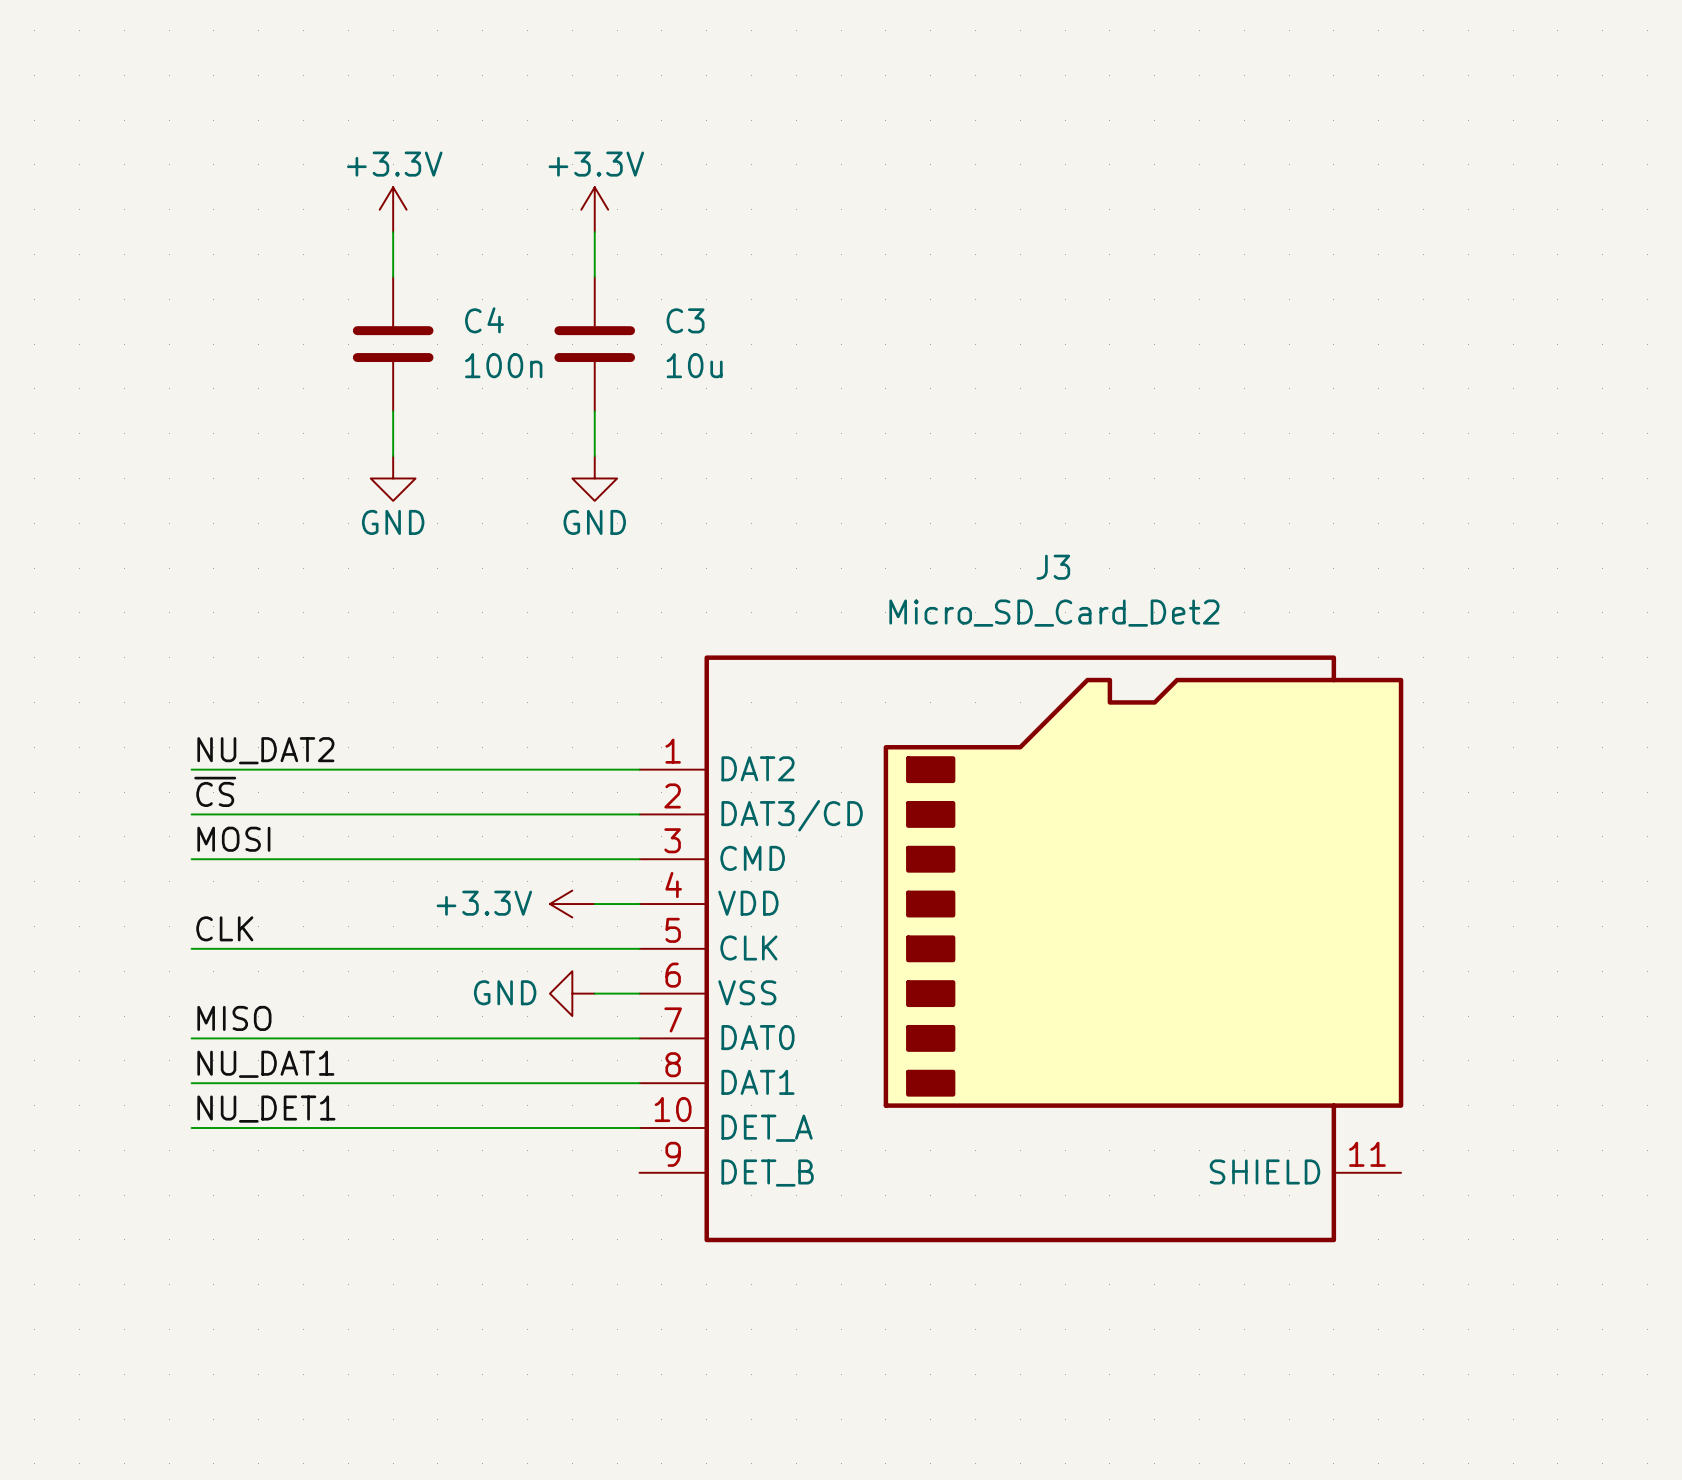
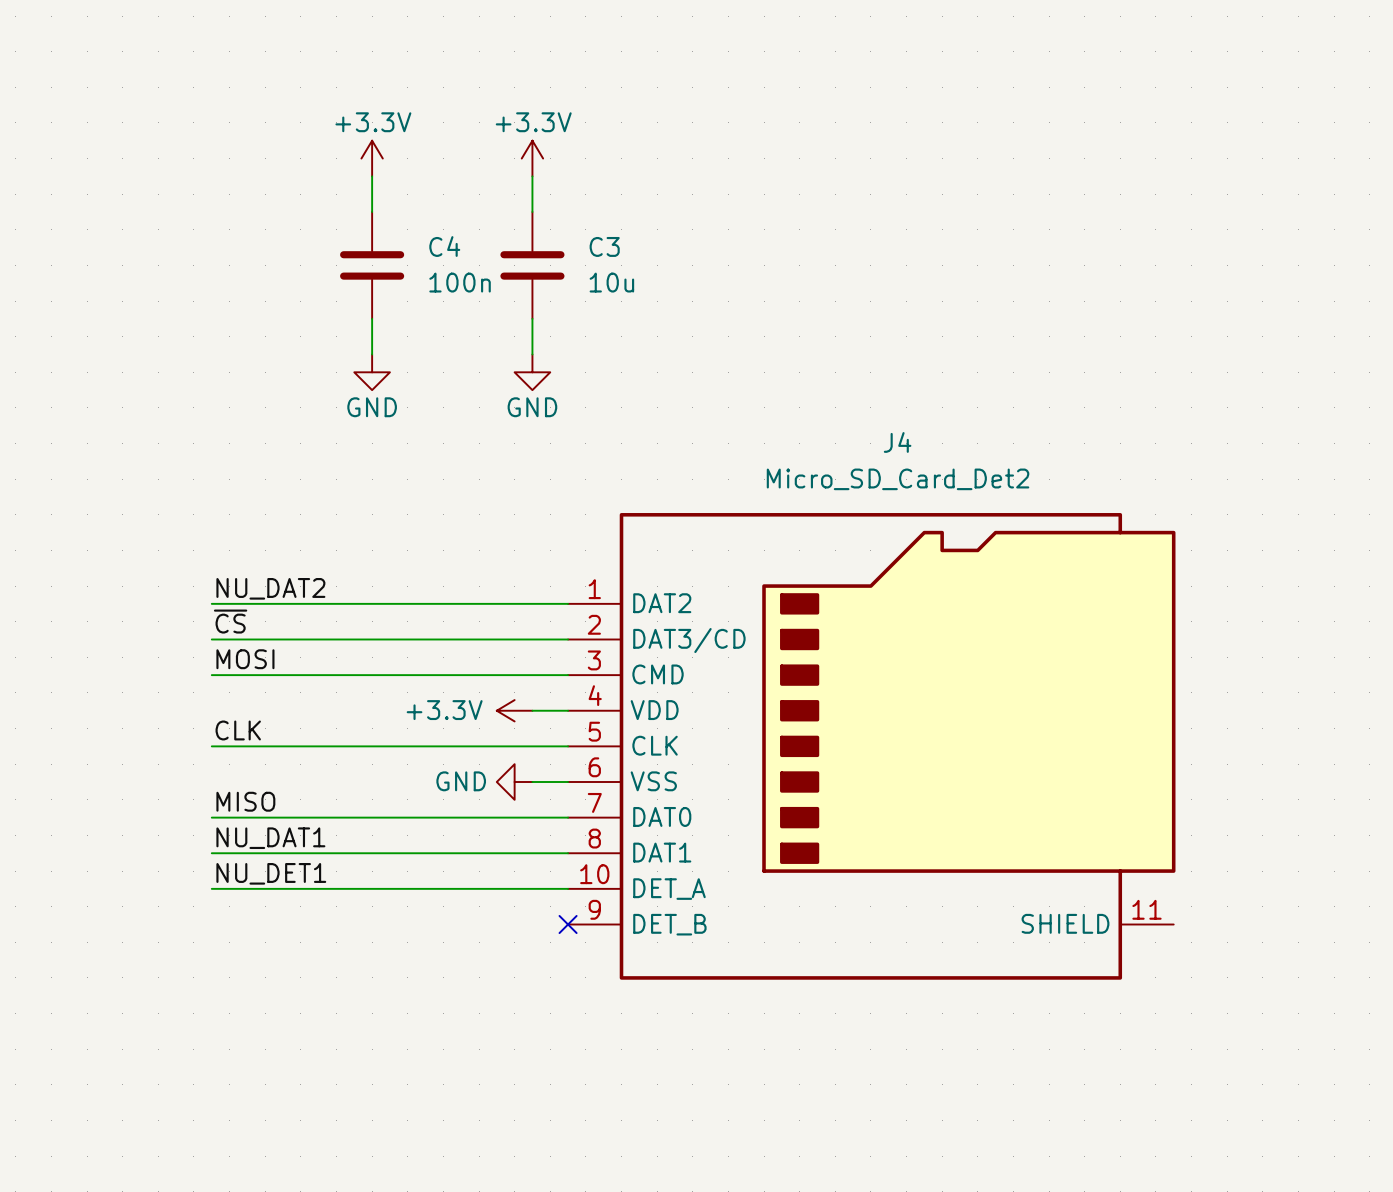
J3 name: J3 (1053, 567) -> J4 (897, 442)
no-connect mark: none -> (568, 924)

